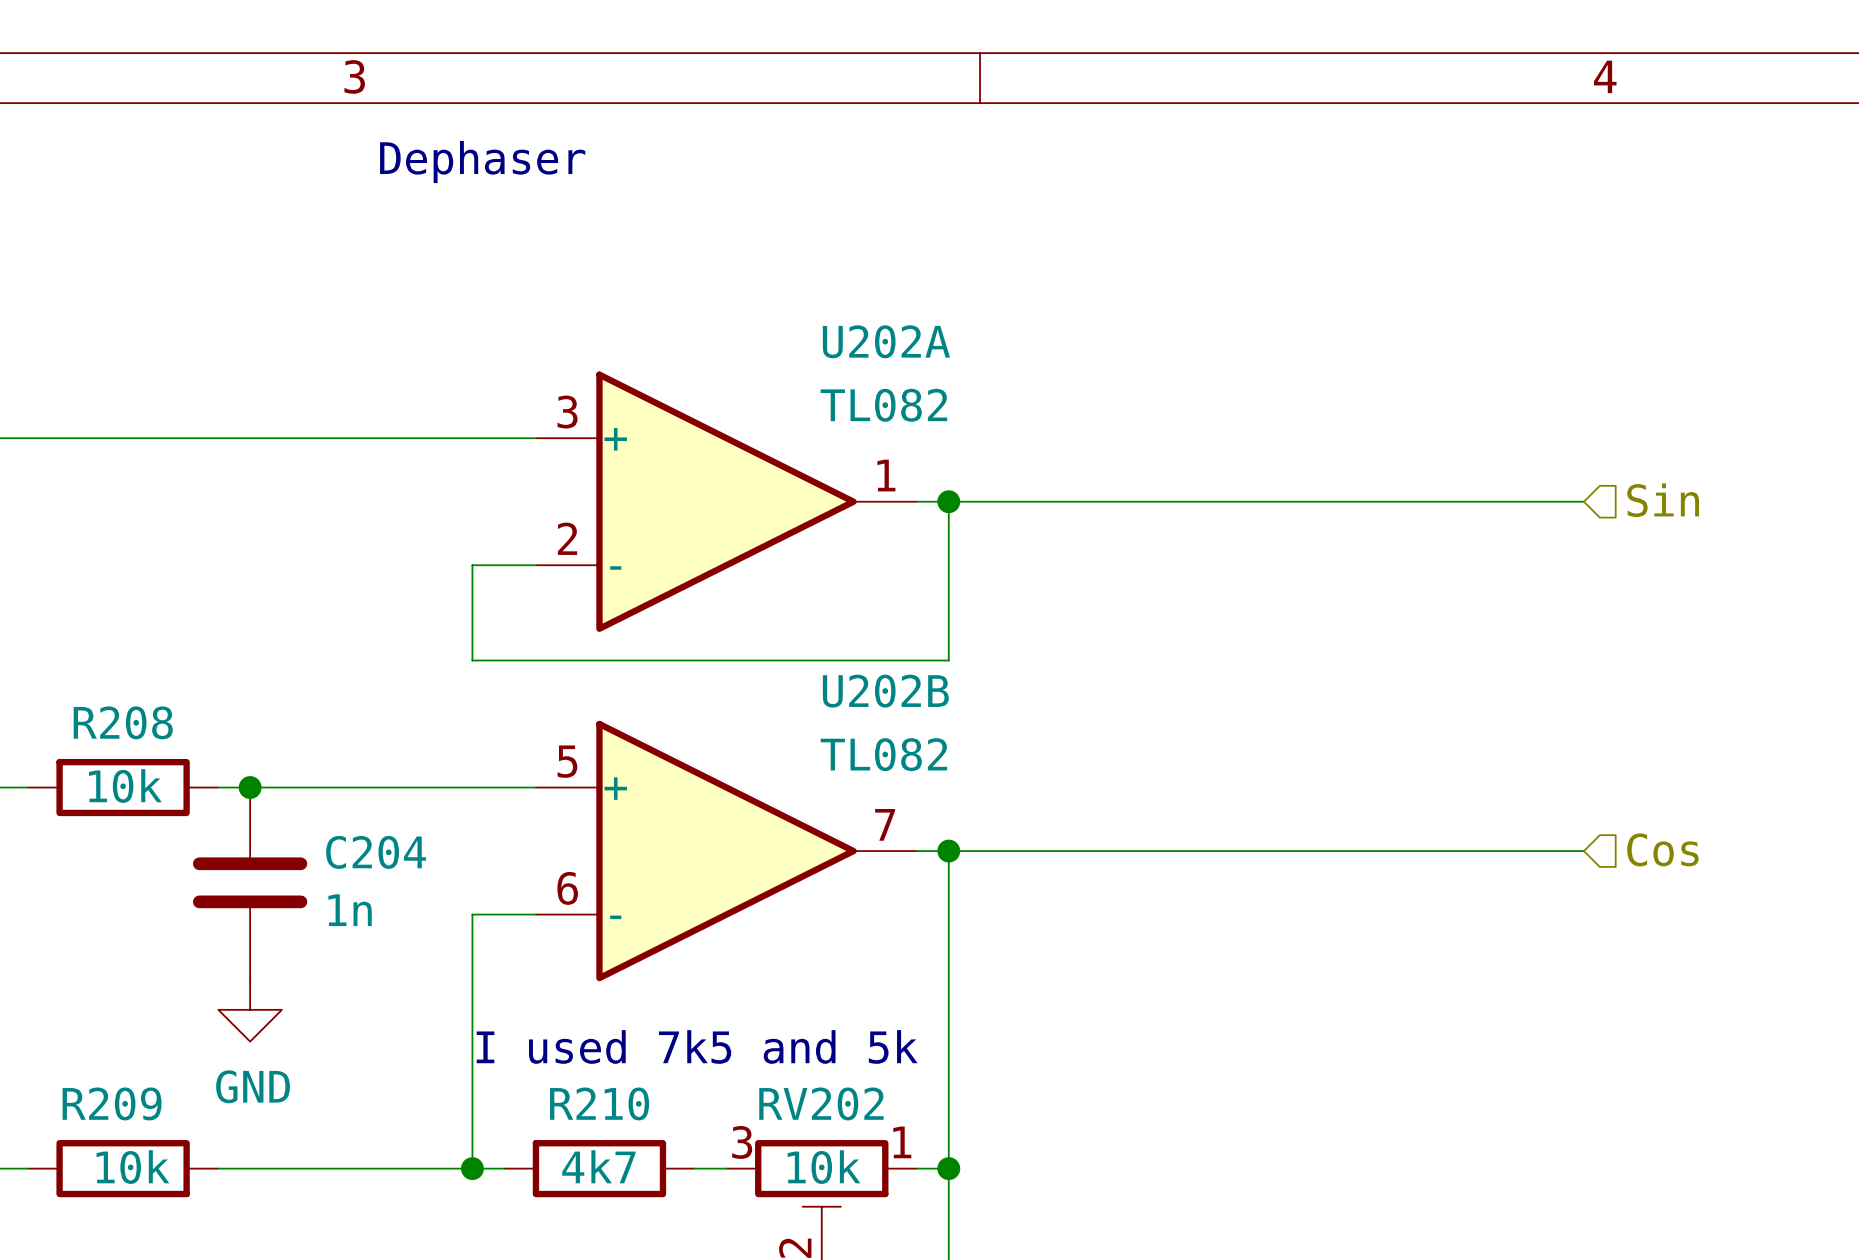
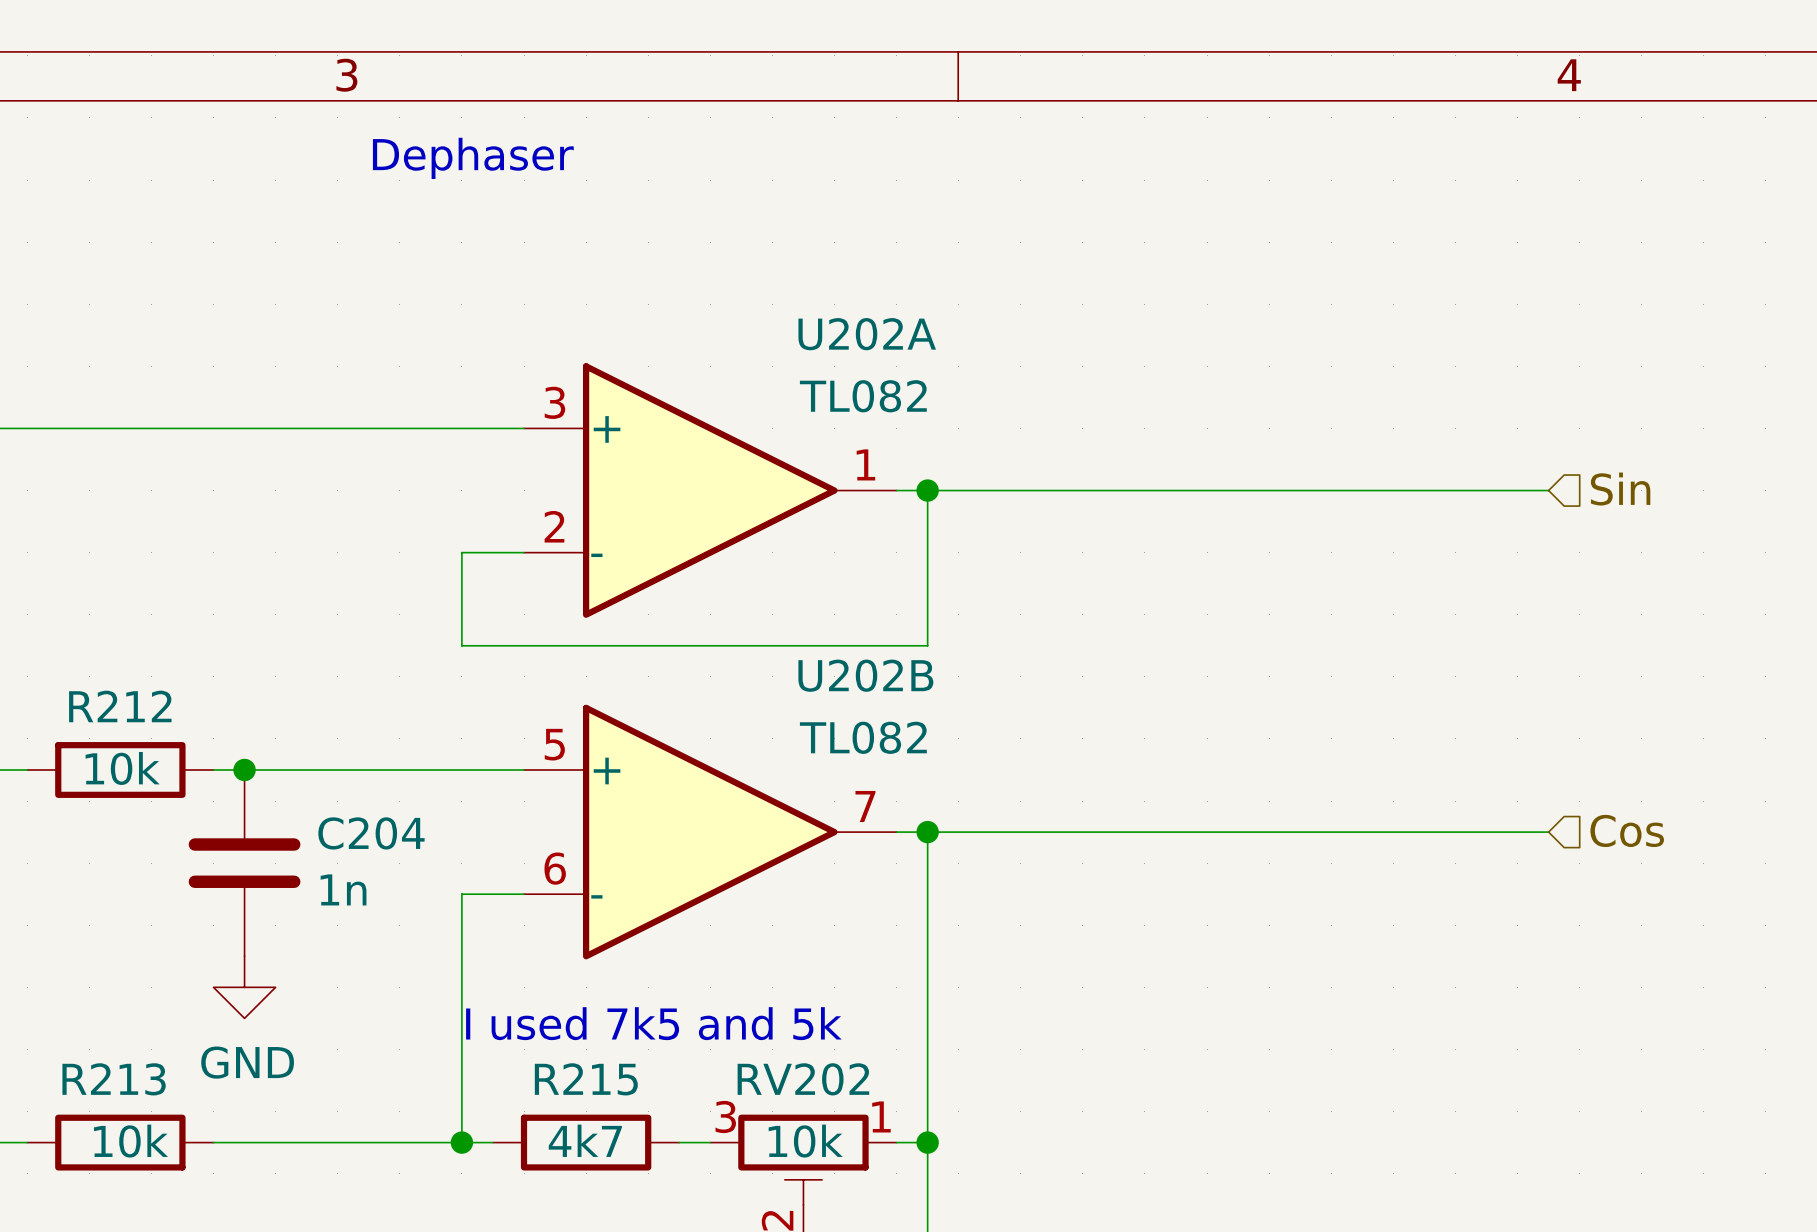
R208 name: R208 (123, 722) -> R212 (120, 706)
R209 name: R209 (112, 1103) -> R213 (114, 1079)
R210 name: R210 (599, 1103) -> R215 (586, 1079)

